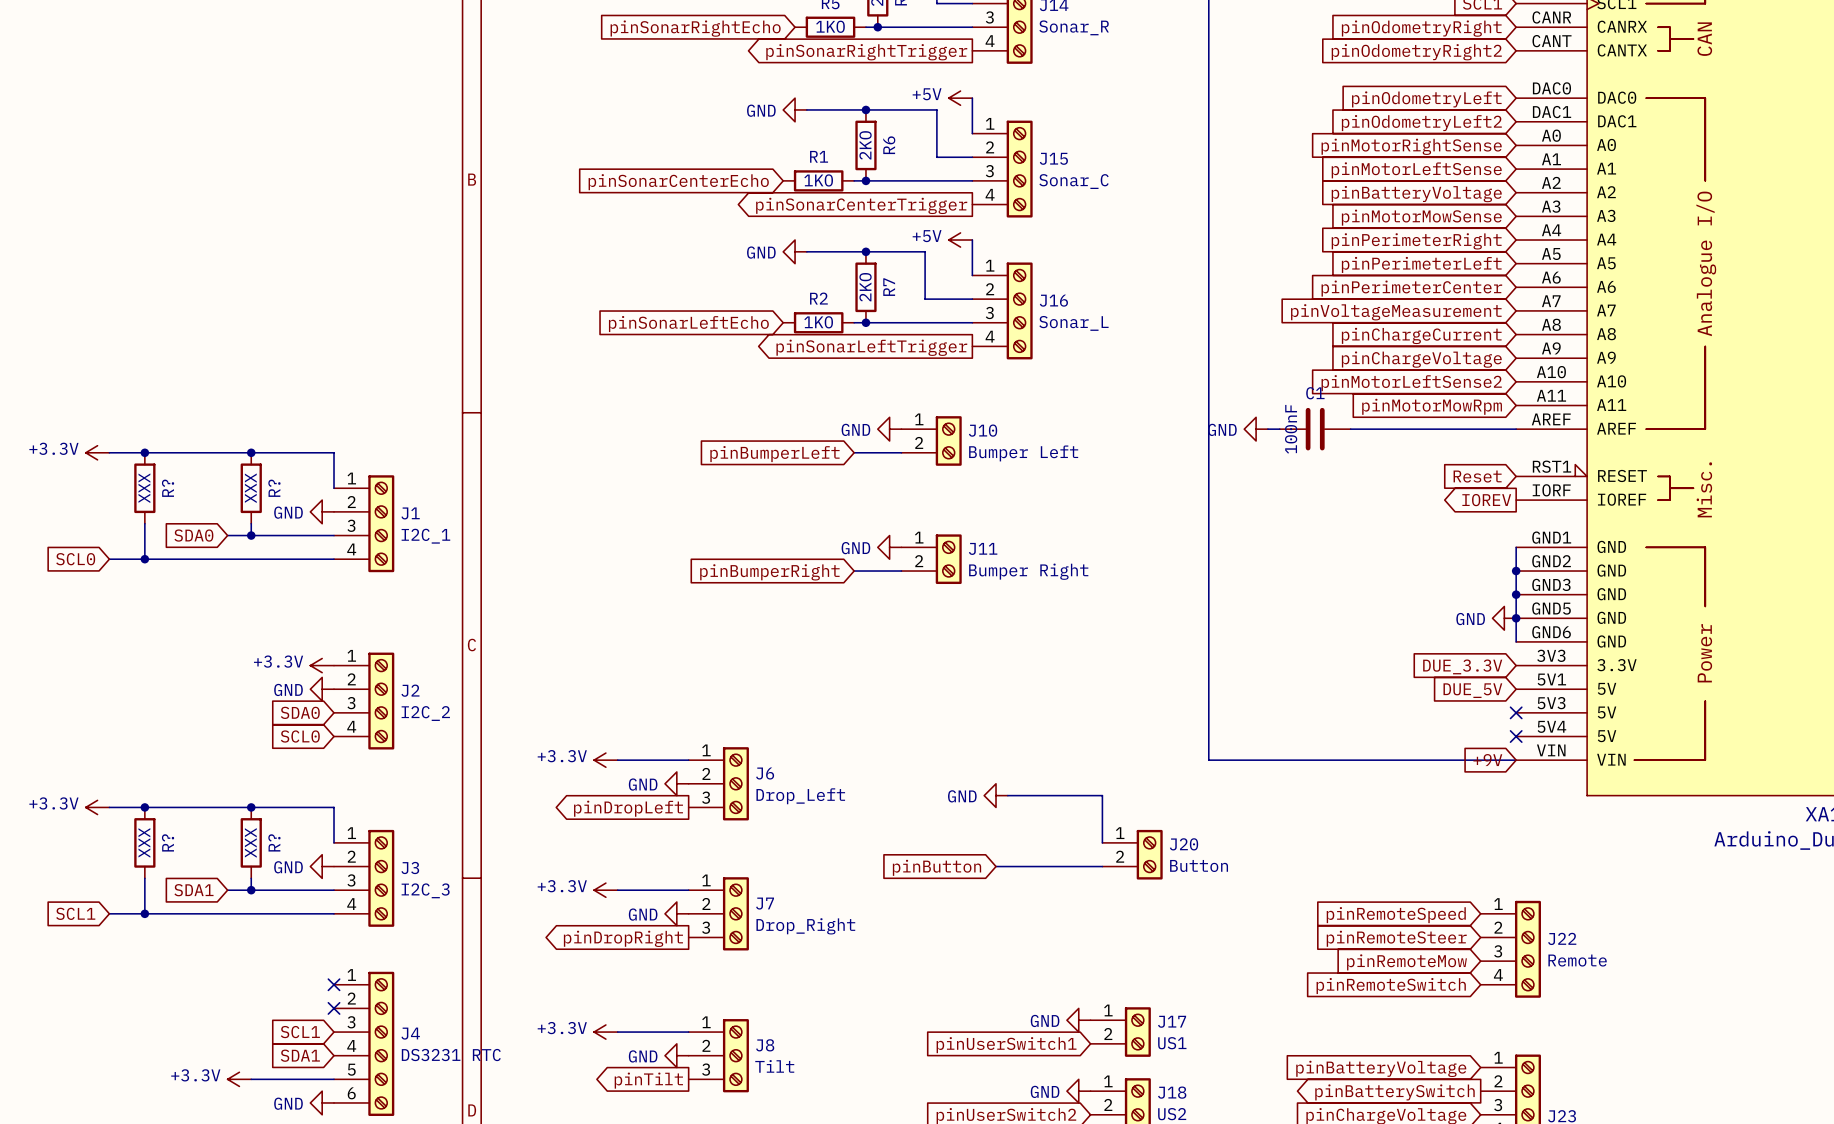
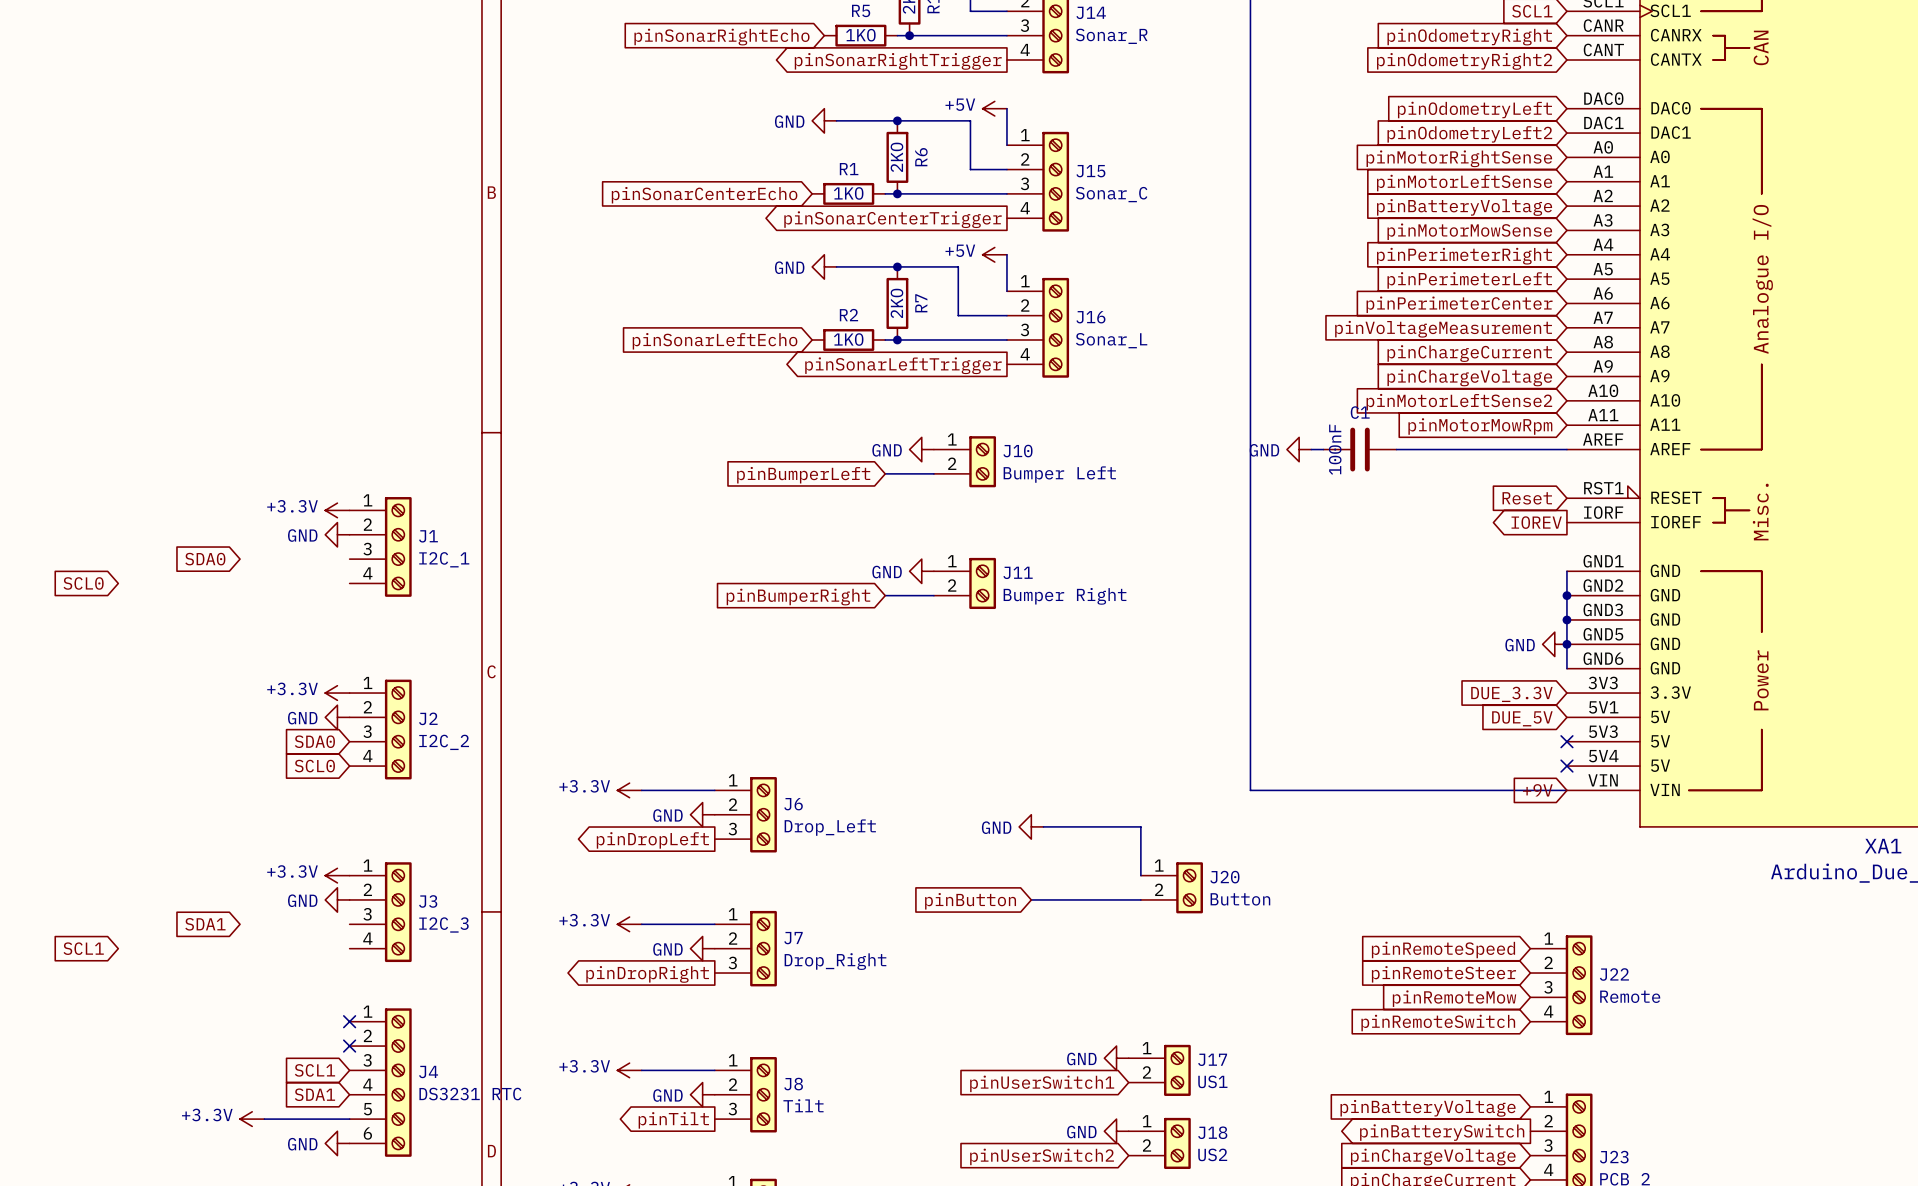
power symbol: +3.3V (97, 452) -> none
wire: (109, 452) (334, 452) (334, 488) -> none
junction: (144, 452) -> none
junction: (251, 452) -> none
R?: XXX (144, 488) -> none
R?: XXX (251, 488) -> none
power symbol: none -> +3.3V (337, 510)
wire: (144, 523) (144, 559) -> none
wire: (251, 523) (251, 535) -> none
wire: (227, 535) (334, 535) -> none
junction: (251, 535) -> none
wire: (109, 559) (334, 559) -> none
junction: (144, 559) -> none
power symbol: +3.3V (97, 807) -> none
wire: (109, 807) (334, 807) (334, 842) -> none
junction: (144, 807) -> none
junction: (251, 807) -> none
R?: XXX (144, 842) -> none
R?: XXX (251, 842) -> none
power symbol: none -> +3.3V (337, 875)
wire: (144, 878) (144, 913) -> none
wire: (251, 878) (251, 890) -> none
wire: (227, 890) (334, 890) -> none
junction: (251, 890) -> none
wire: (109, 913) (334, 913) -> none
junction: (144, 913) -> none

